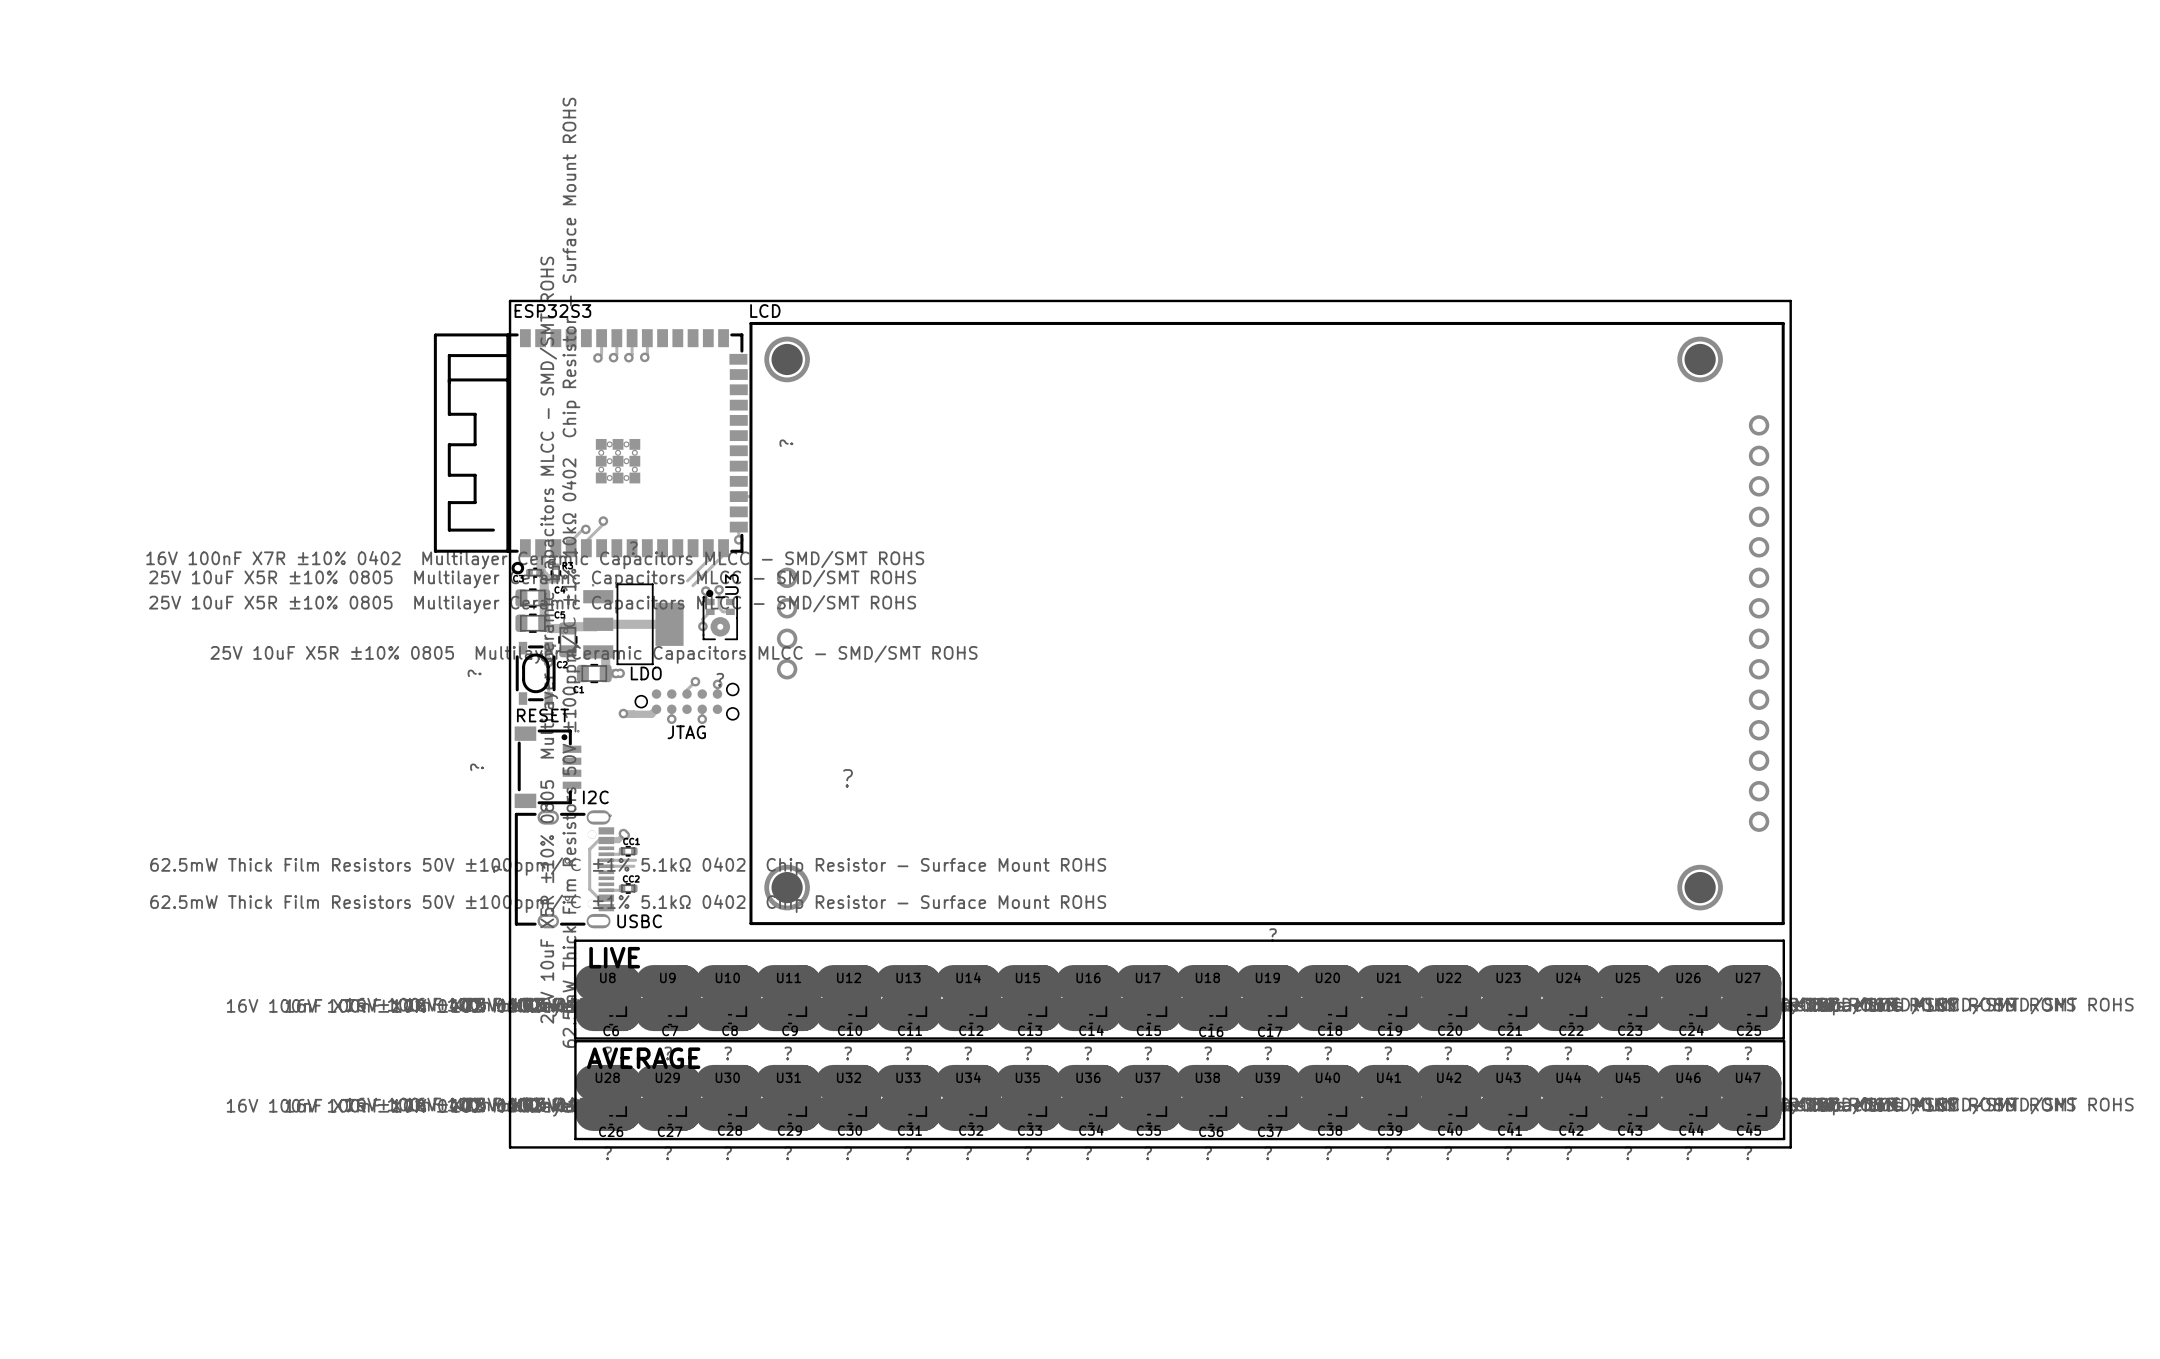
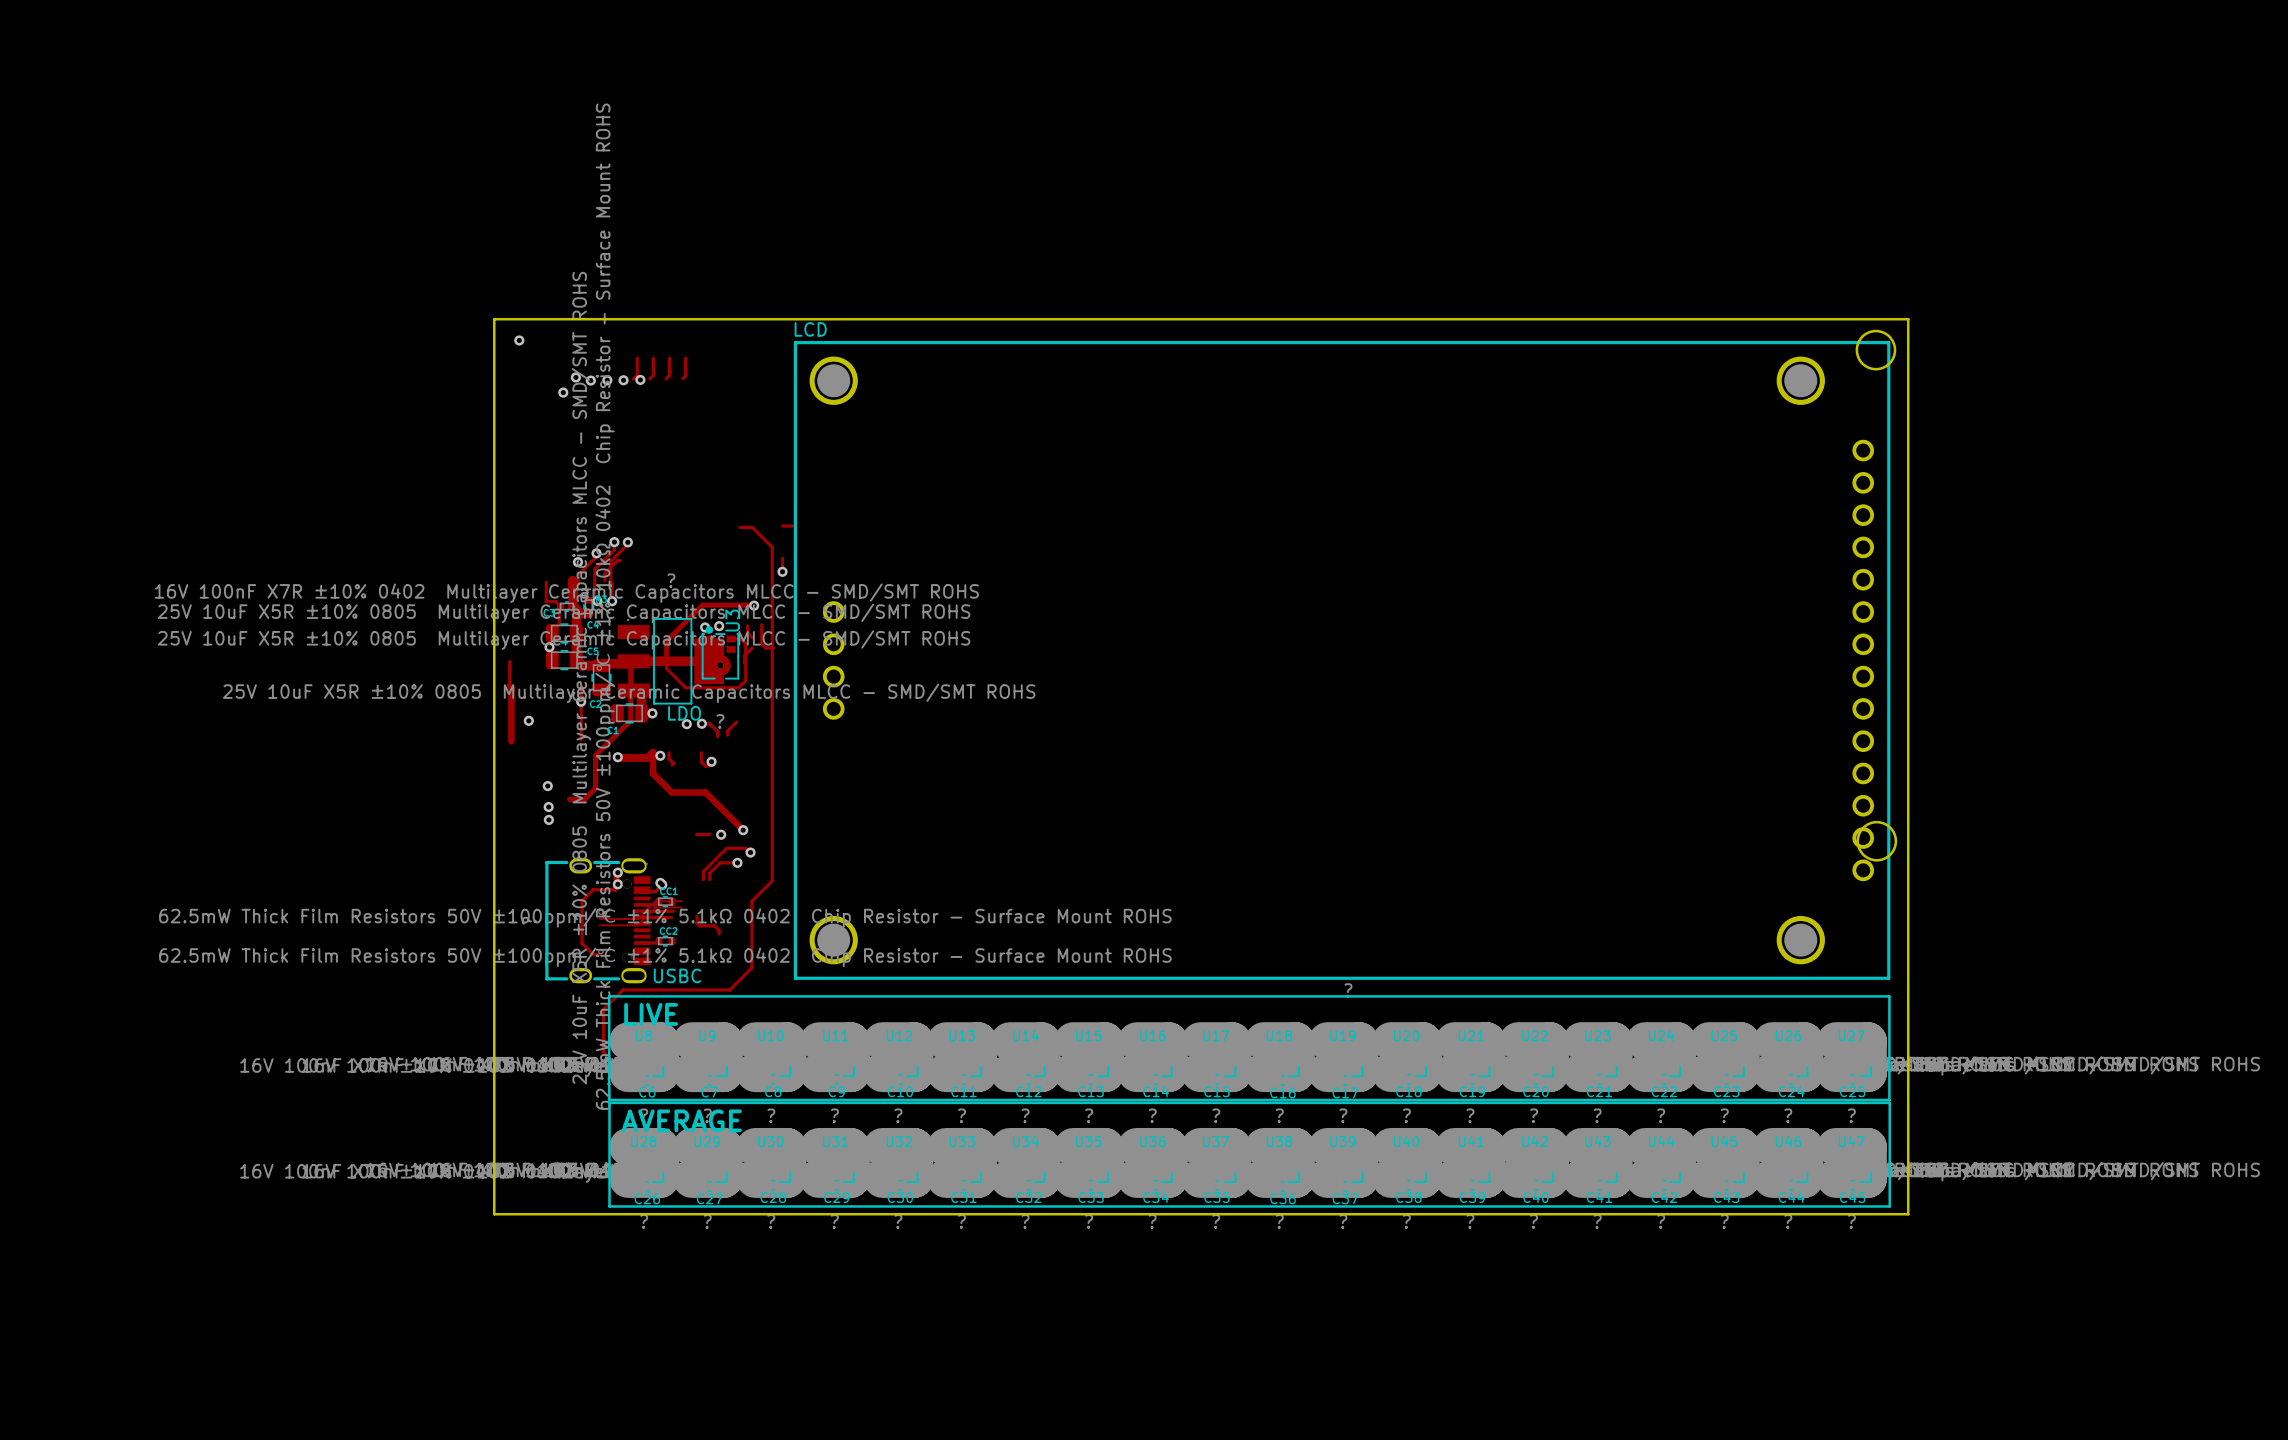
board edge: (510, 300) (1790, 300) (1790, 1147) (510, 1147) (510, 300) -> (494, 319) (494, 1214) (1908, 1214) (1908, 319) (494, 319)
round board edge: none -> [1855, 329, 1897, 371]
via: none -> (519, 340)
via: none -> (575, 377)
via: (597, 357) -> none
via: (613, 357) -> none
via: (628, 357) -> none
via: (644, 357) -> none
via: none -> (607, 380)
via: none -> (623, 380)
via: none -> (640, 379)
via: none -> (590, 380)
via: none -> (563, 392)
ESP32S3: ? (590, 451) -> none
track: none -> (740, 527) (752, 527) (772, 547) (772, 880) (751, 901) (751, 967) (729, 989) (623, 989) (603, 1009) (603, 1052) (616, 1065) (623, 1065)
track: none -> (614, 542) (614, 549) (594, 569) (594, 598) (597, 600)
via: none -> (614, 542)
track: none -> (627, 542) (610, 561) (612, 601)
via: none -> (627, 542)
track: (603, 521) (603, 524) (586, 541) (586, 548) -> (596, 553) (596, 556) (578, 574) (578, 582)
via: (603, 521) -> none
via: none -> (596, 553)
via: (585, 529) -> none
via: none -> (578, 562)
track: (708, 548) (708, 560) (687, 580) -> none
track: (723, 548) (723, 555) (692, 585) -> none
track: none -> (546, 582) (546, 601) (555, 601) (559, 605) (559, 624) (549, 634) (549, 647)
via: none -> (597, 600)
via: none -> (612, 601)
track: none -> (754, 605) (702, 605) (666, 641) (666, 668) (685, 687) (738, 687) (745, 680) (745, 643) (741, 639) (731, 639)
via: none -> (754, 605)
via: (719, 589) -> none
via: none -> (719, 626)
via: (705, 591) -> none
via: none -> (705, 627)
via: none -> (549, 647)
U3 position: (720, 615) -> (720, 652)
track: none -> (509, 661) (511, 741)
track: none -> (630, 662) (630, 720) (595, 755) (595, 788) (584, 799) (569, 799)
via: (702, 626) -> none
RESET: ? (535, 673) -> none
via: (620, 673) -> none
via: none -> (528, 720)
via: (695, 681) -> none
via: none -> (686, 724)
track: none -> (701, 723) (709, 723) (717, 731) (717, 736)
via: none -> (701, 723)
via: (717, 684) -> none
JTAG: ? (687, 701) -> none
track: (656, 709) (651, 714) (623, 714) -> none
track: none -> (669, 752) (669, 758) (673, 763) (672, 765)
track: none -> (701, 752) (701, 761) (705, 766) (708, 766)
via: none -> (617, 757)
track: none -> (617, 757) (642, 757)
track: none -> (642, 757) (647, 757) (653, 752) (653, 773) (671, 792) (705, 792) (743, 830)
via: (702, 719) -> none
via: none -> (547, 786)
via: none -> (548, 807)
I2C: ? (547, 767) -> none
via: none -> (548, 819)
round board edge: none -> [1856, 820, 1898, 862]
via: none -> (743, 830)
track: none -> (709, 833) (696, 834)
via: none -> (721, 834)
track: none -> (750, 852) (746, 848) (726, 848) (703, 871) (703, 879)
via: none -> (750, 852)
track: none -> (737, 862) (720, 862) (709, 873) (709, 879)
via: none -> (737, 862)
via: none -> (617, 872)
track: (623, 833) (618, 838) (600, 838) (589, 849) (589, 889) (600, 899) (606, 899) -> none
via: none -> (617, 884)
track: none -> (615, 890) (615, 875) (617, 872) (618, 883) (612, 889) (593, 889) (582, 900) (582, 943) (593, 954) (599, 954)
track: none -> (681, 901) (655, 901) (637, 918) (599, 918)
track: none -> (681, 907) (655, 907) (637, 925) (599, 925)
track: none -> (697, 916) (697, 923) (699, 925) (714, 925) (719, 930) (719, 934)

